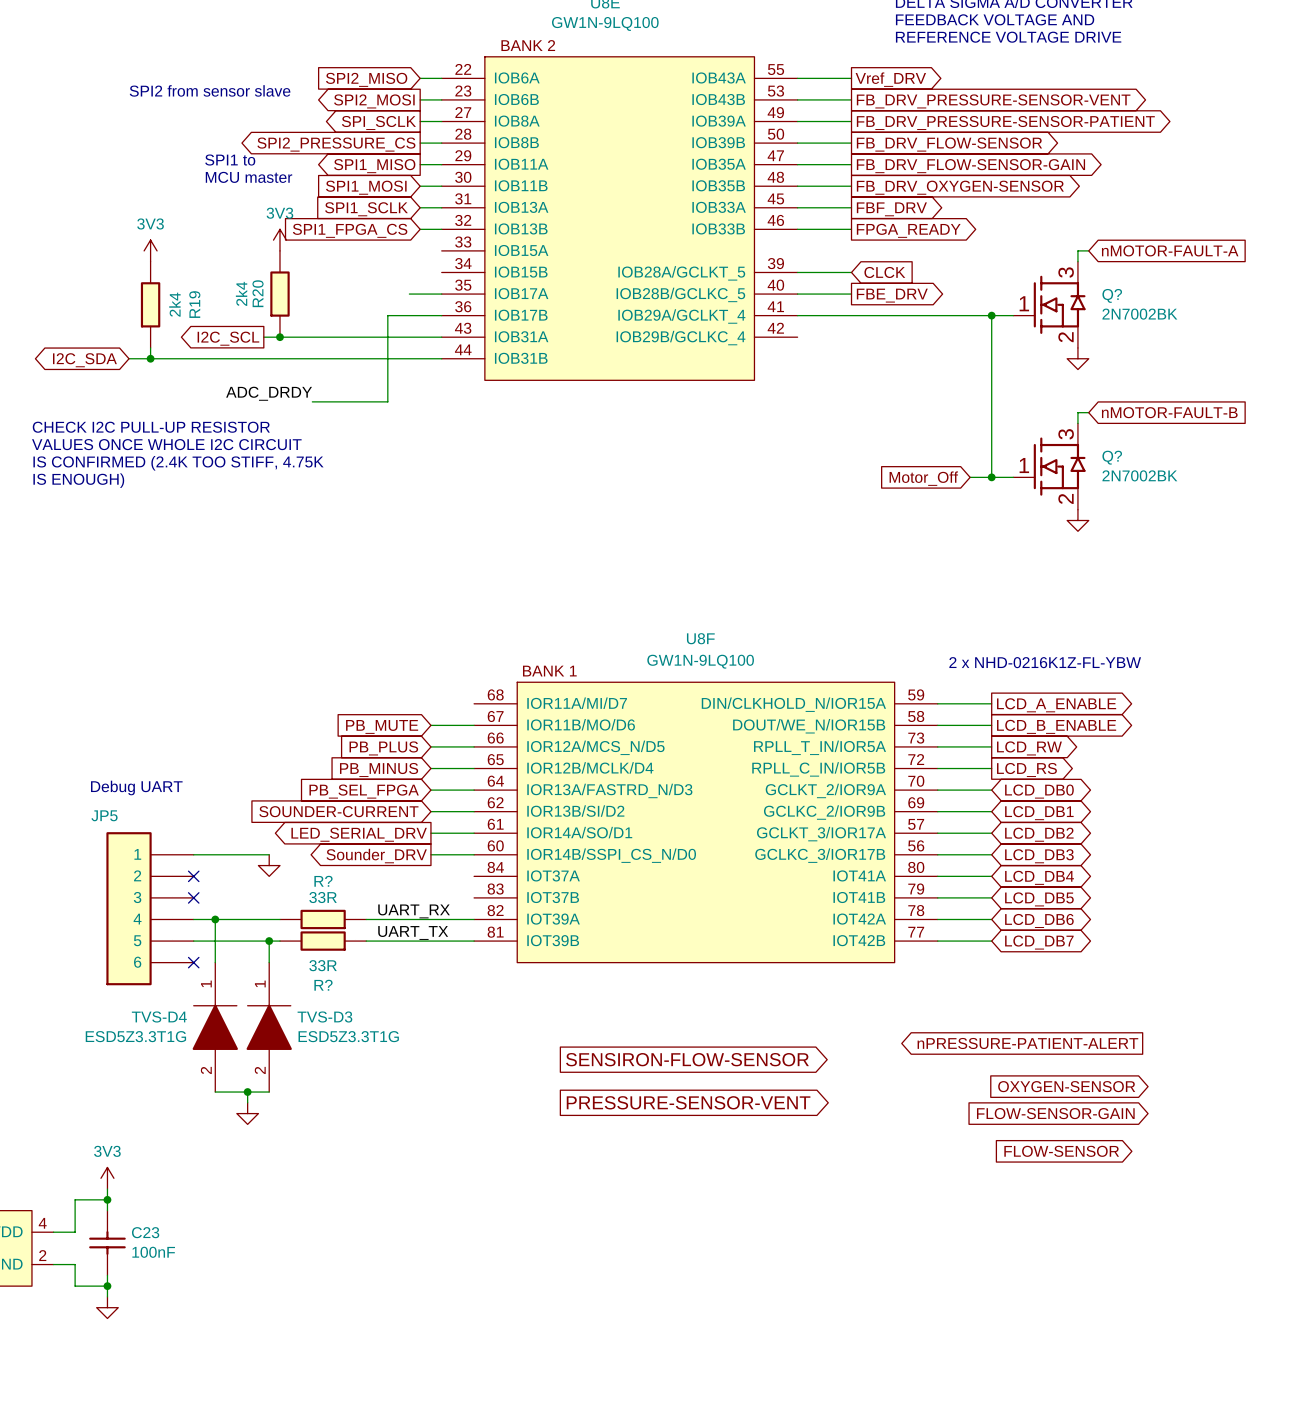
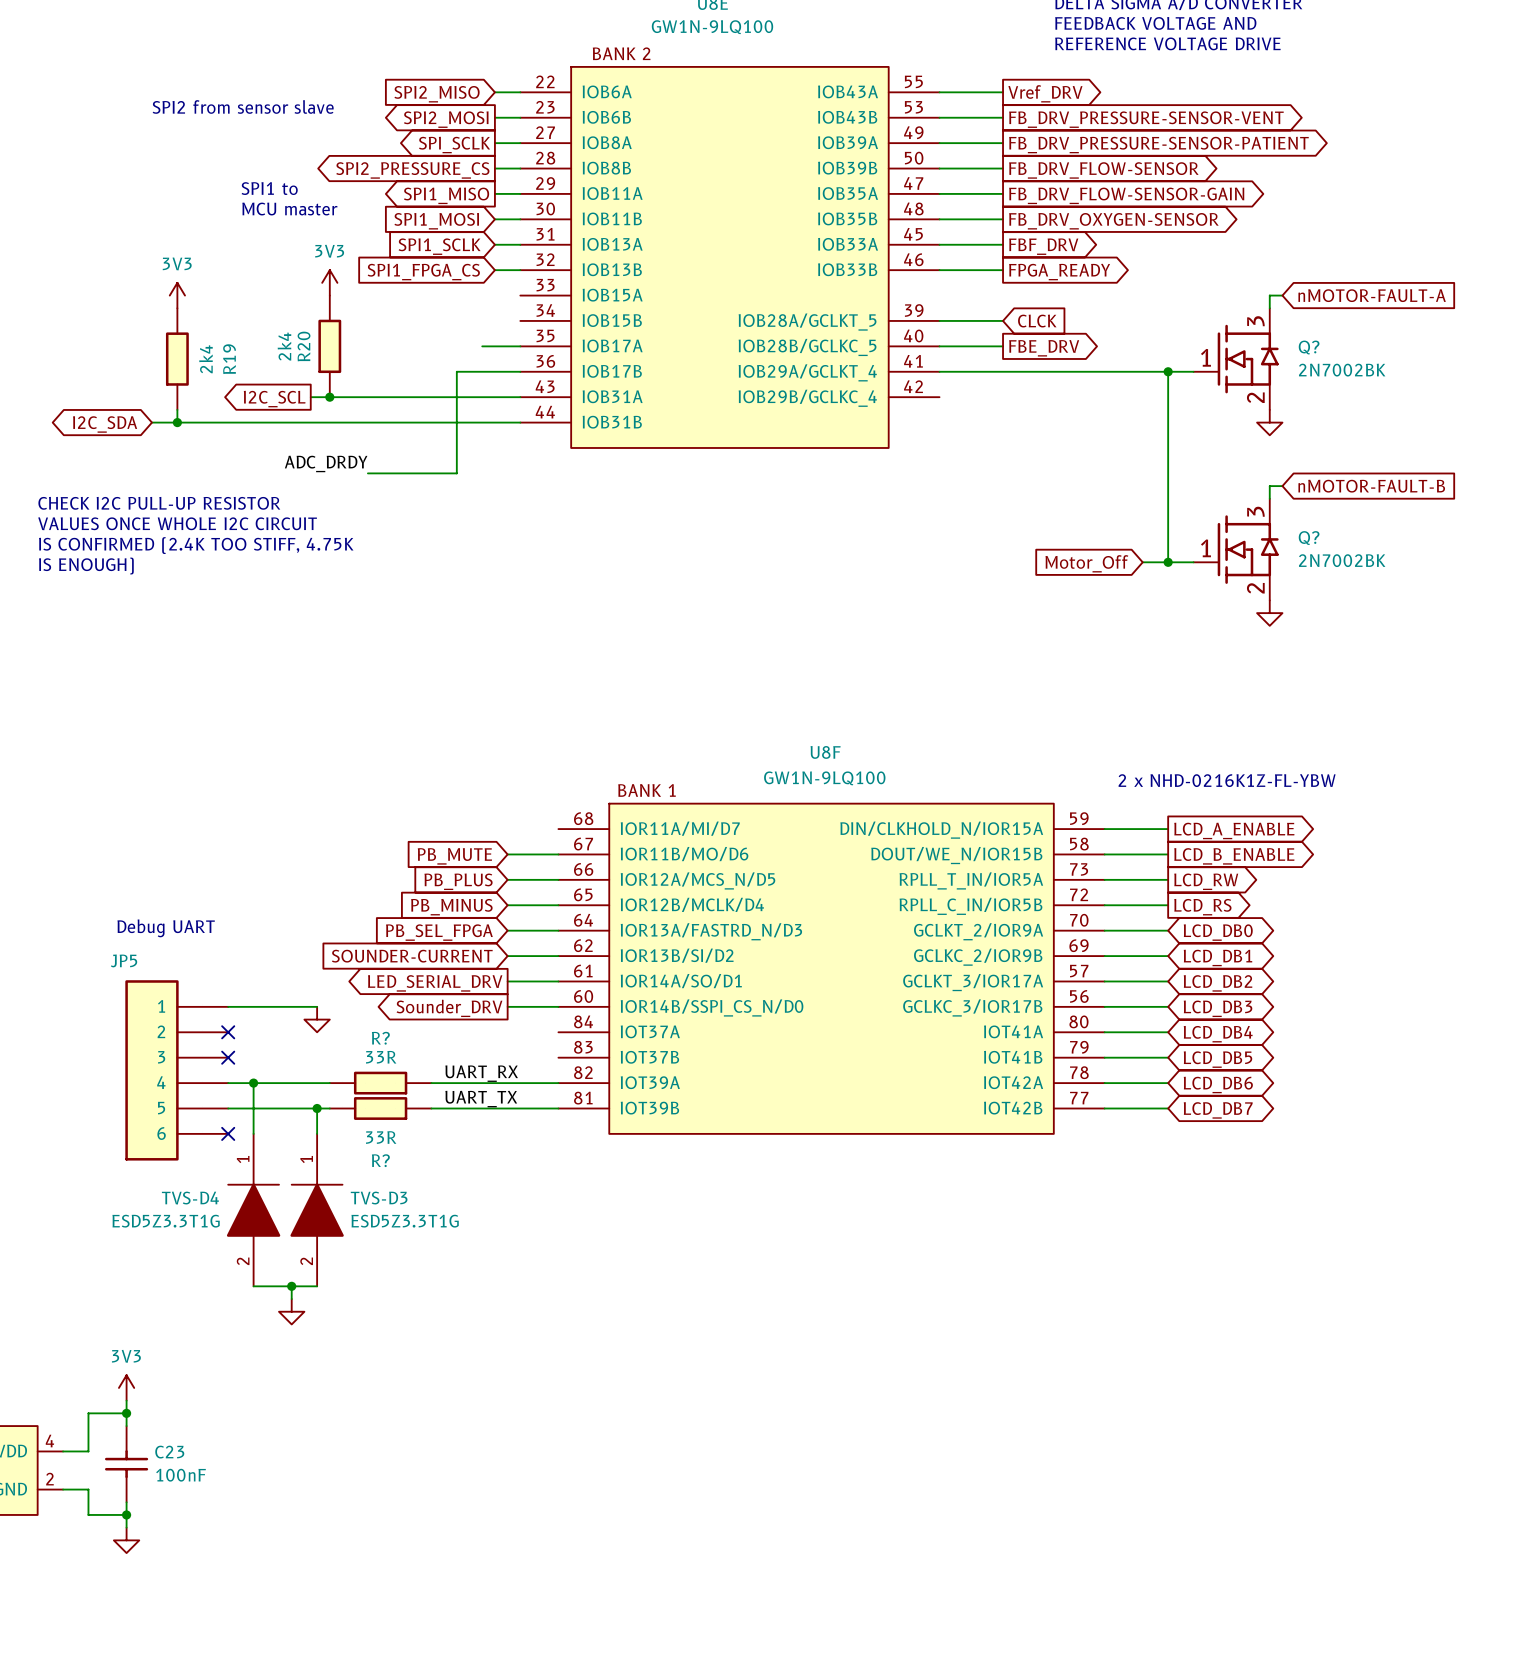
global label: nPRESSURE-PATIENT-ALERT (1027, 1043) -> none
global label: SENSIRON-FLOW-SENSOR (687, 1059) -> none
global label: OXYGEN-SENSOR (1066, 1086) -> none
global label: PRESSURE-SENSOR-VENT (688, 1102) -> none
global label: FLOW-SENSOR-GAIN (1055, 1113) -> none
global label: FLOW-SENSOR (1061, 1151) -> none

